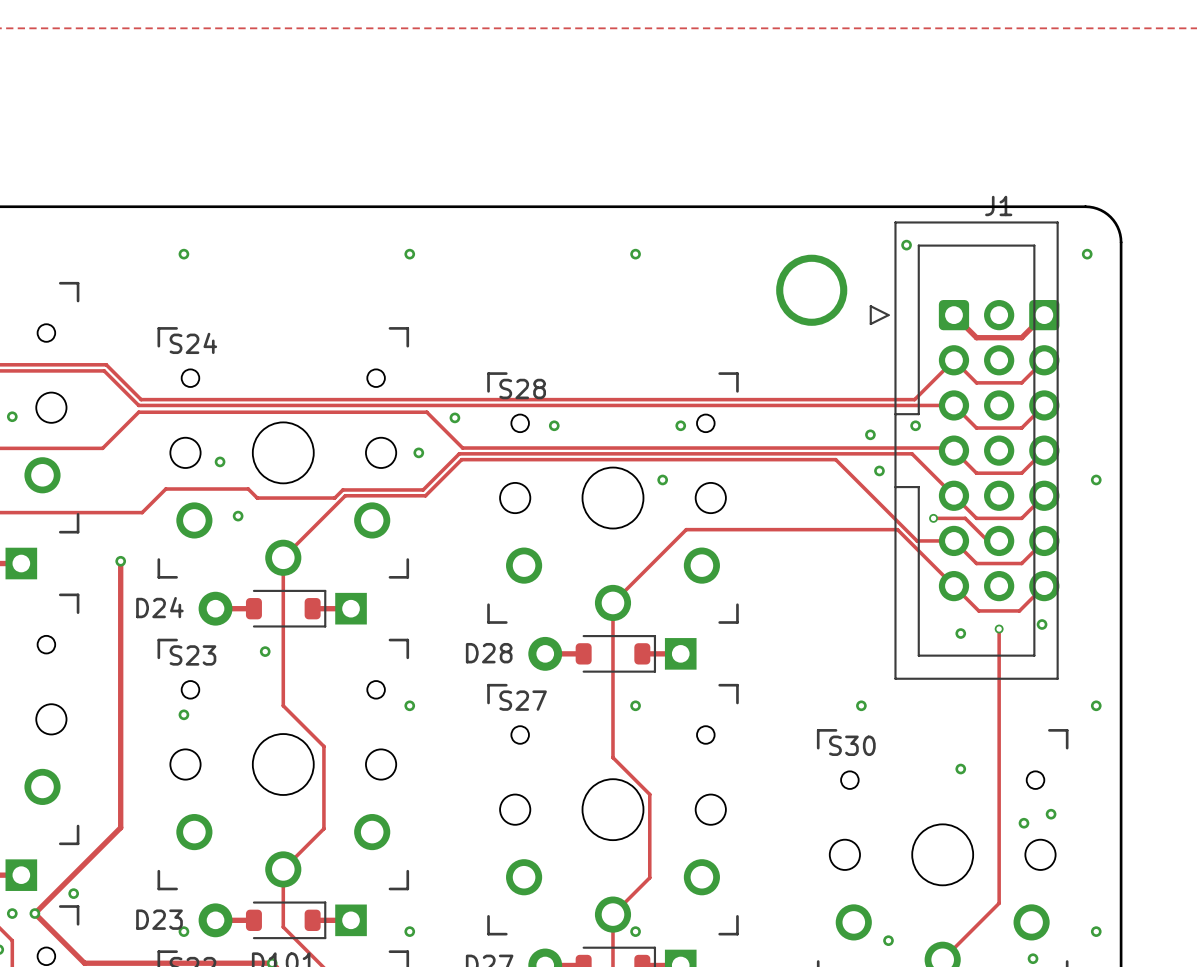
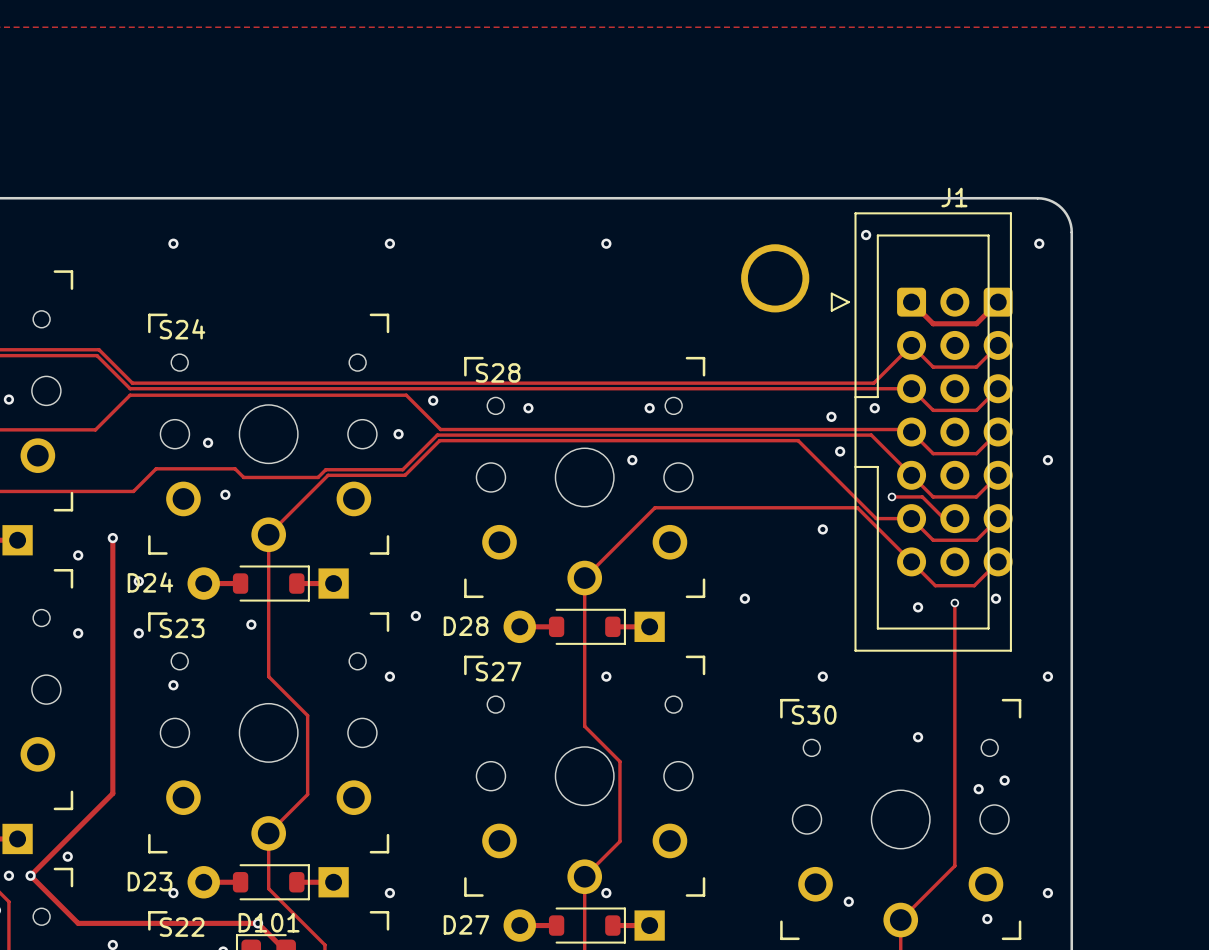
via: none -> (822, 529)
via: none -> (78, 555)
via: none -> (138, 581)
via: none -> (744, 598)
via: none -> (415, 616)
via: none -> (78, 633)
via: none -> (138, 633)

